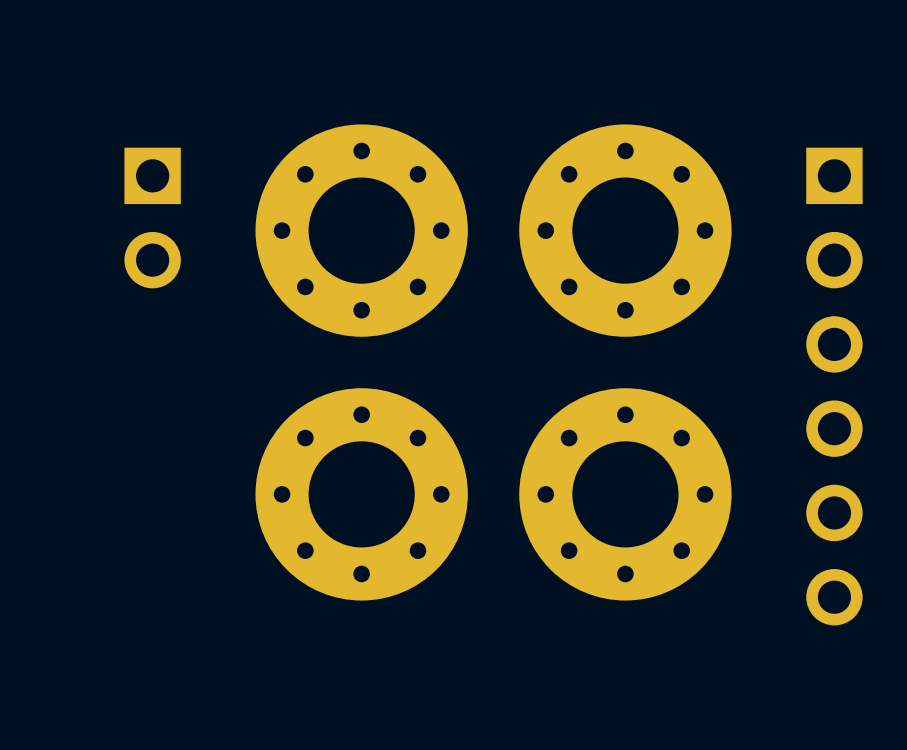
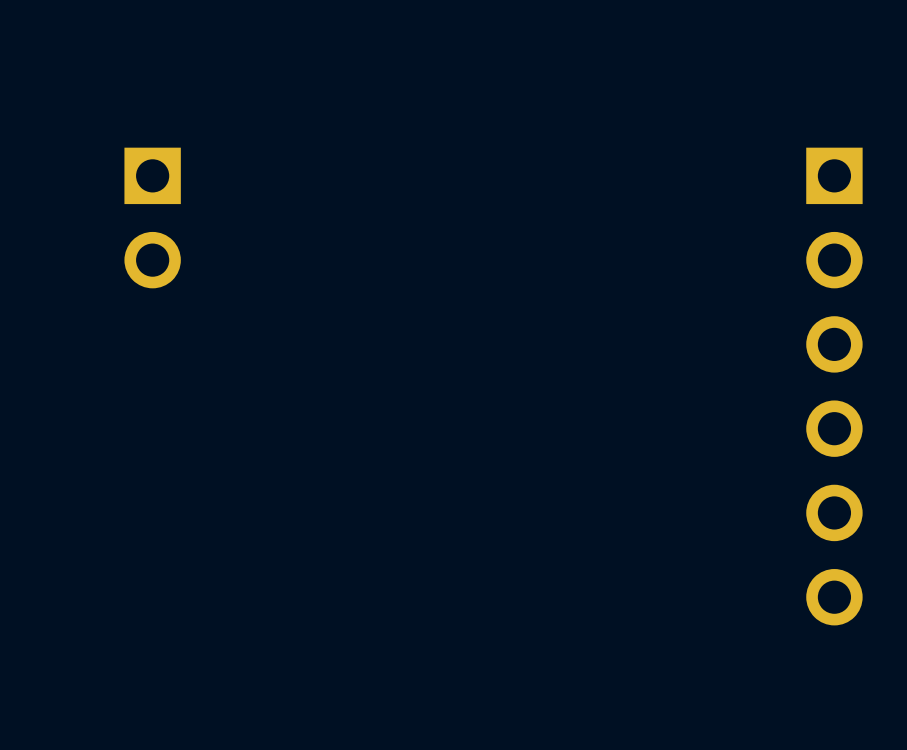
part: (361, 230) -> none
part: (625, 230) -> none
part: (361, 494) -> none
part: (625, 494) -> none

